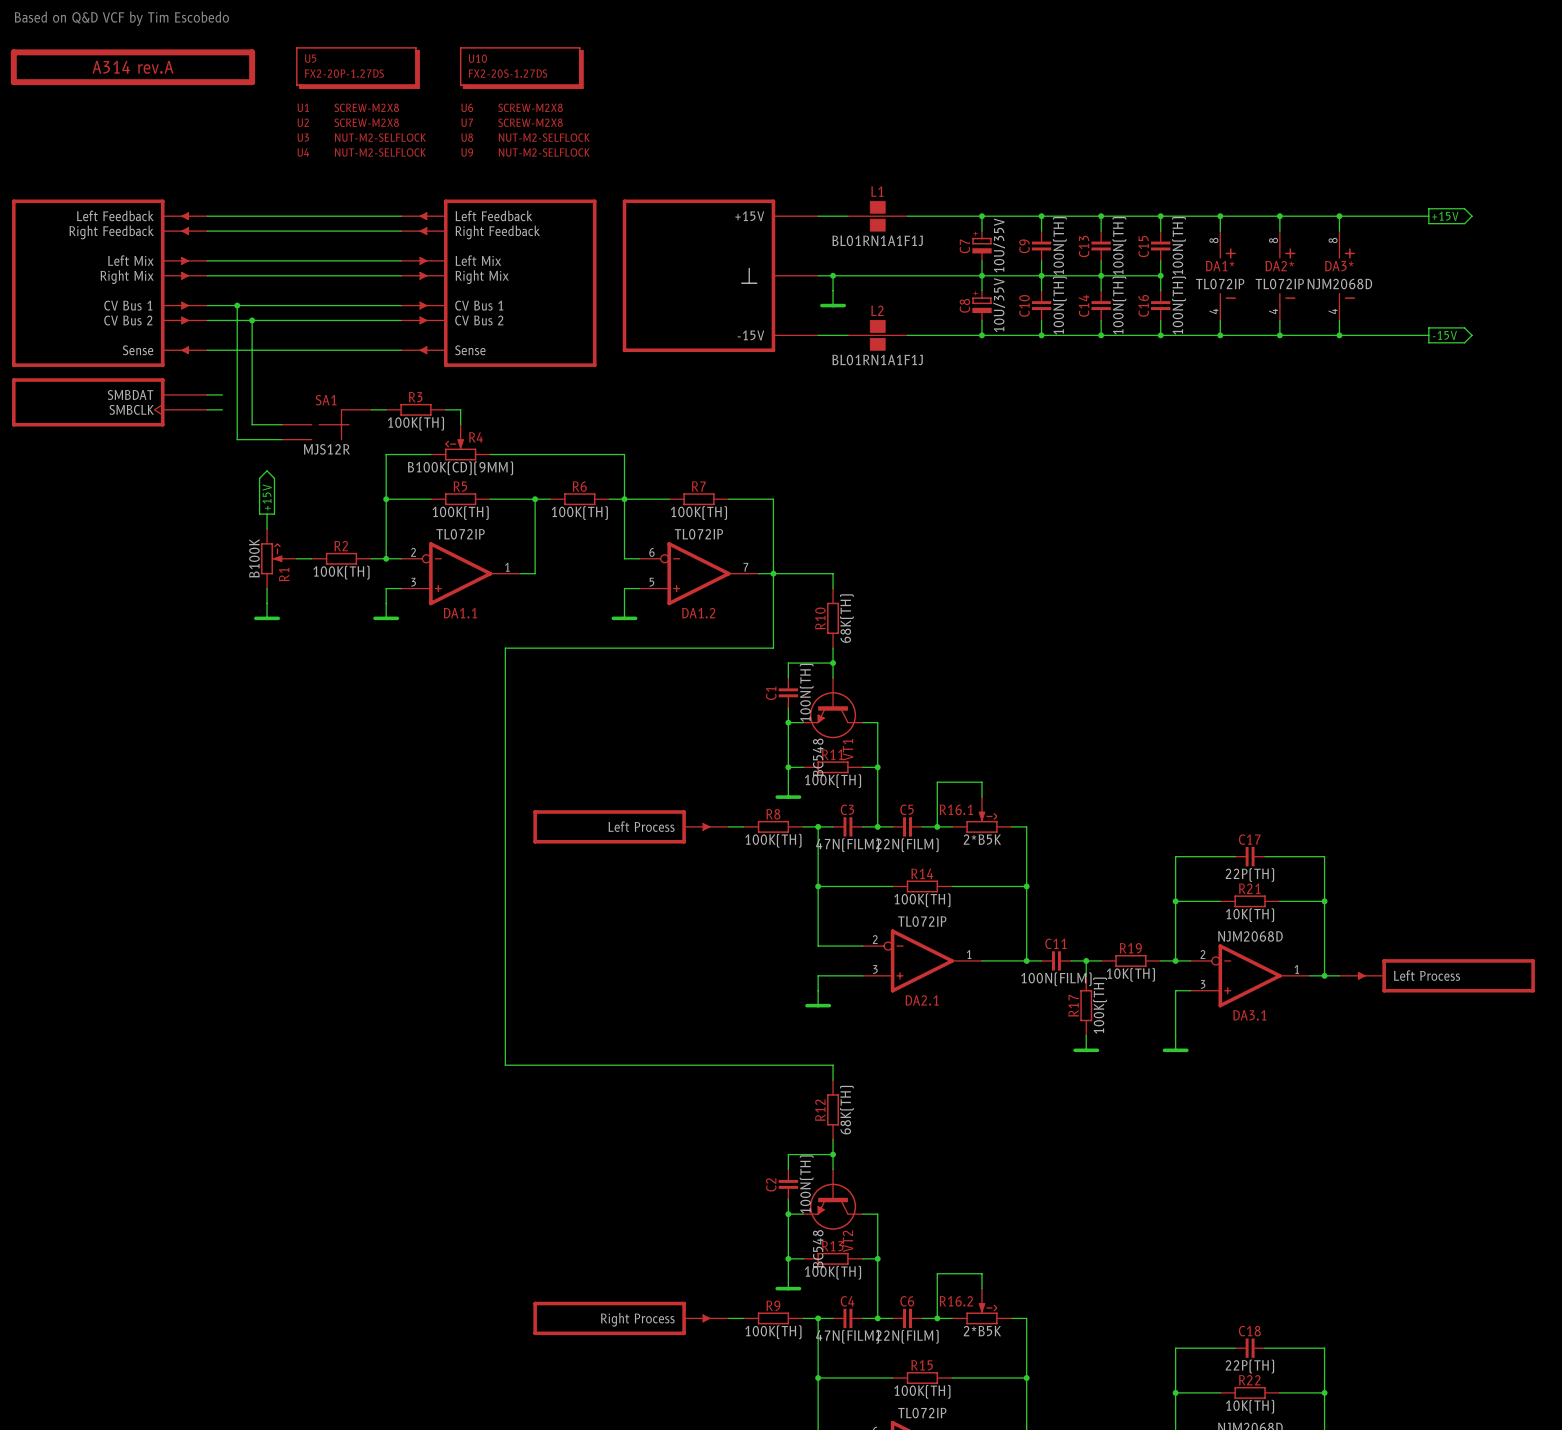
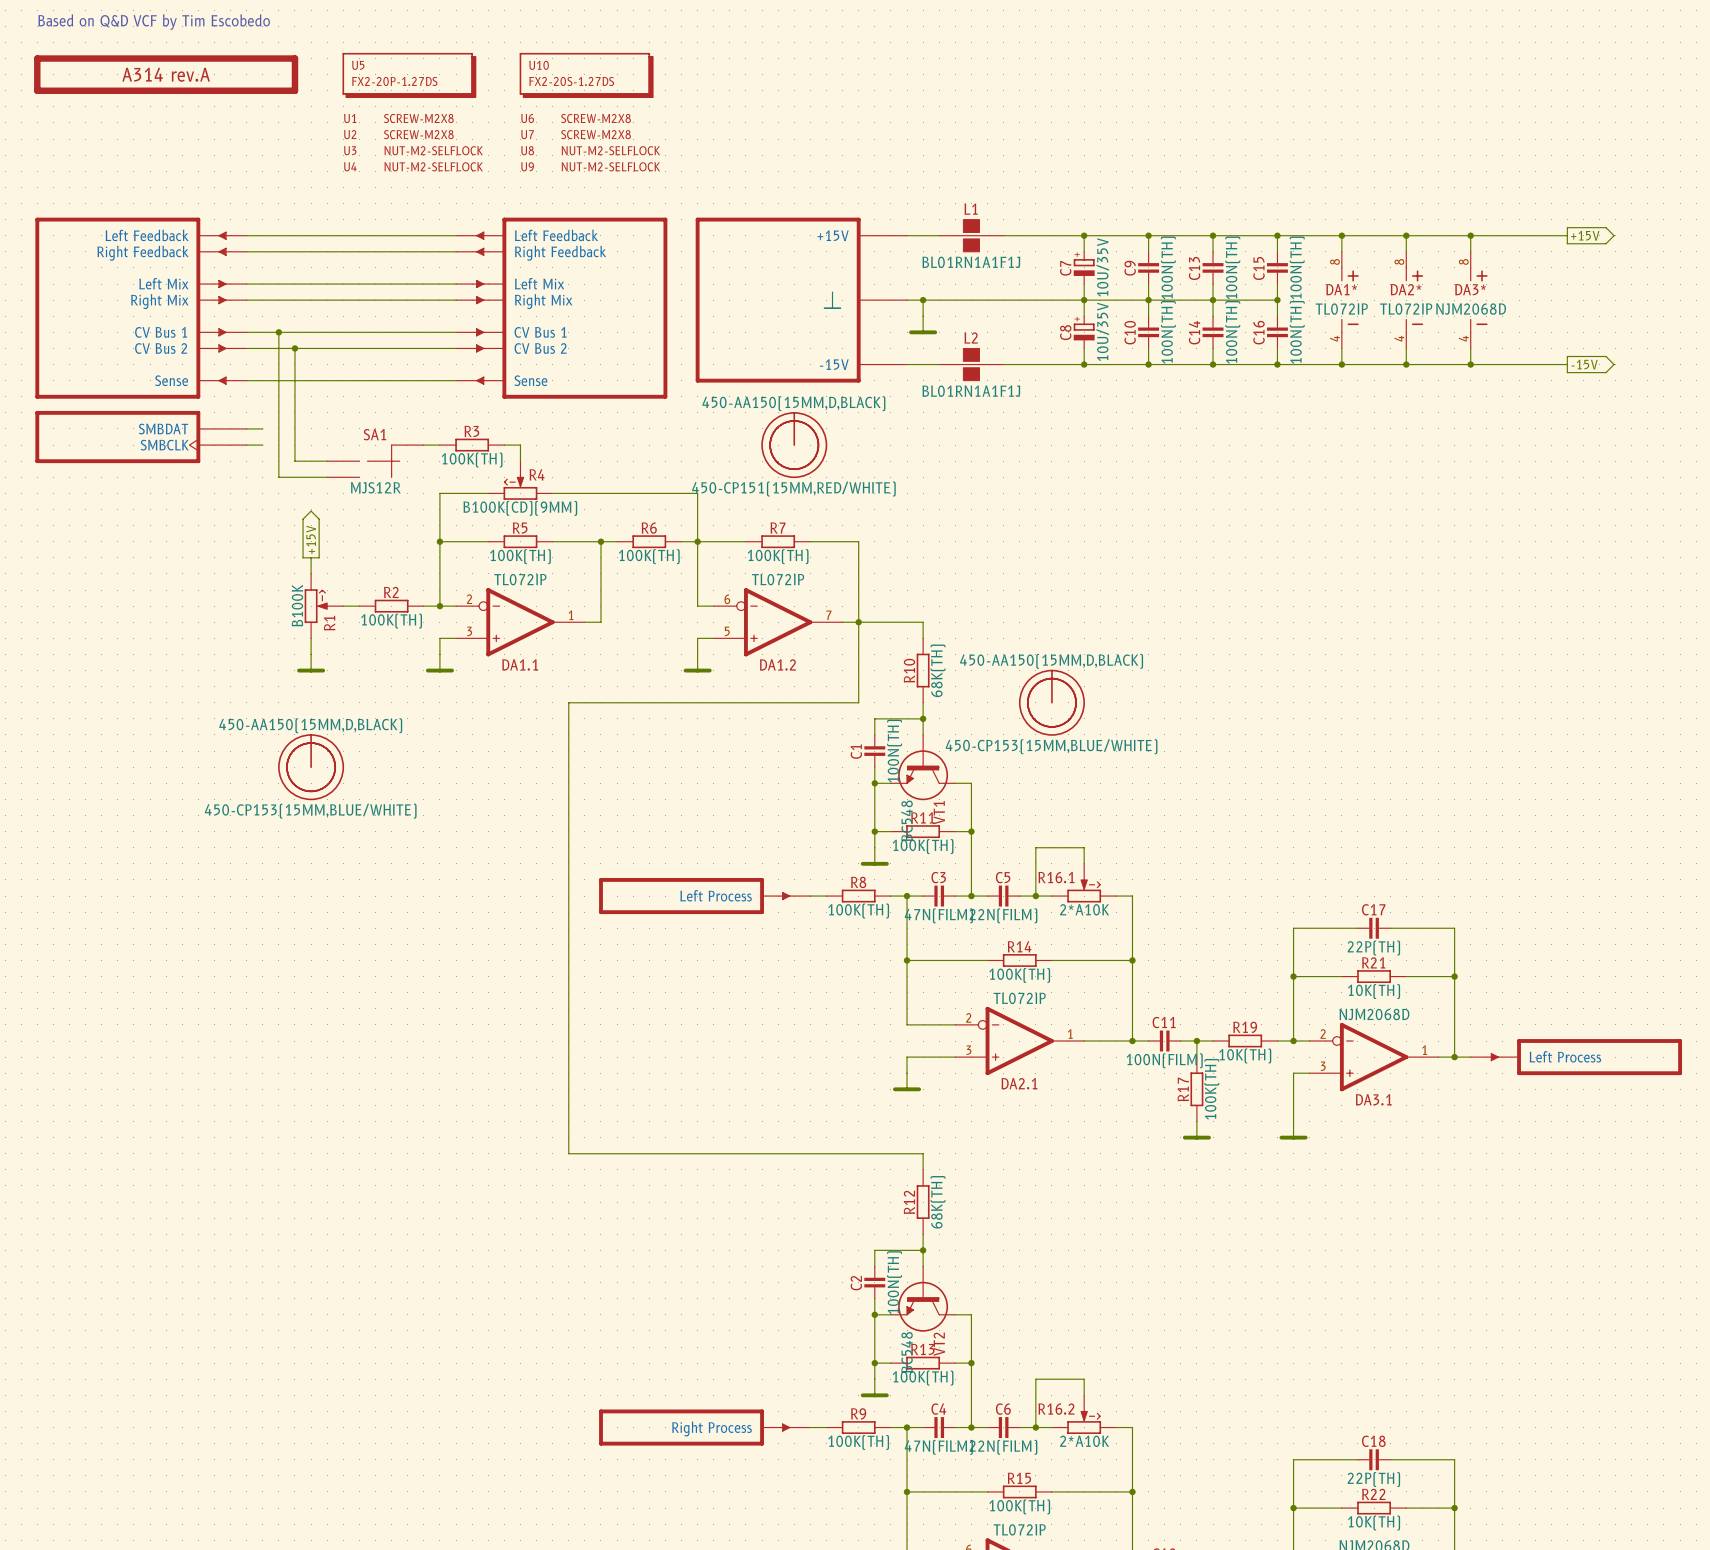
part: none -> 450-AA150(15MM,D,BLACK) (794, 445)
part: none -> 450-CP151(15MM,RED/WHITE) (794, 445)
part: none -> 450-AA150(15MM,D,BLACK) (1051, 702)
part: none -> 450-CP153(15MM,BLUE/WHITE) (1051, 702)
part: none -> 450-AA150(15MM,D,BLACK) (311, 767)
part: none -> 450-CP153(15MM,BLUE/WHITE) (311, 767)
R16.1 value: 2*B5K (982, 839) -> 2*A10K (1084, 909)
R16.2 value: 2*B5K (982, 1331) -> 2*A10K (1084, 1441)

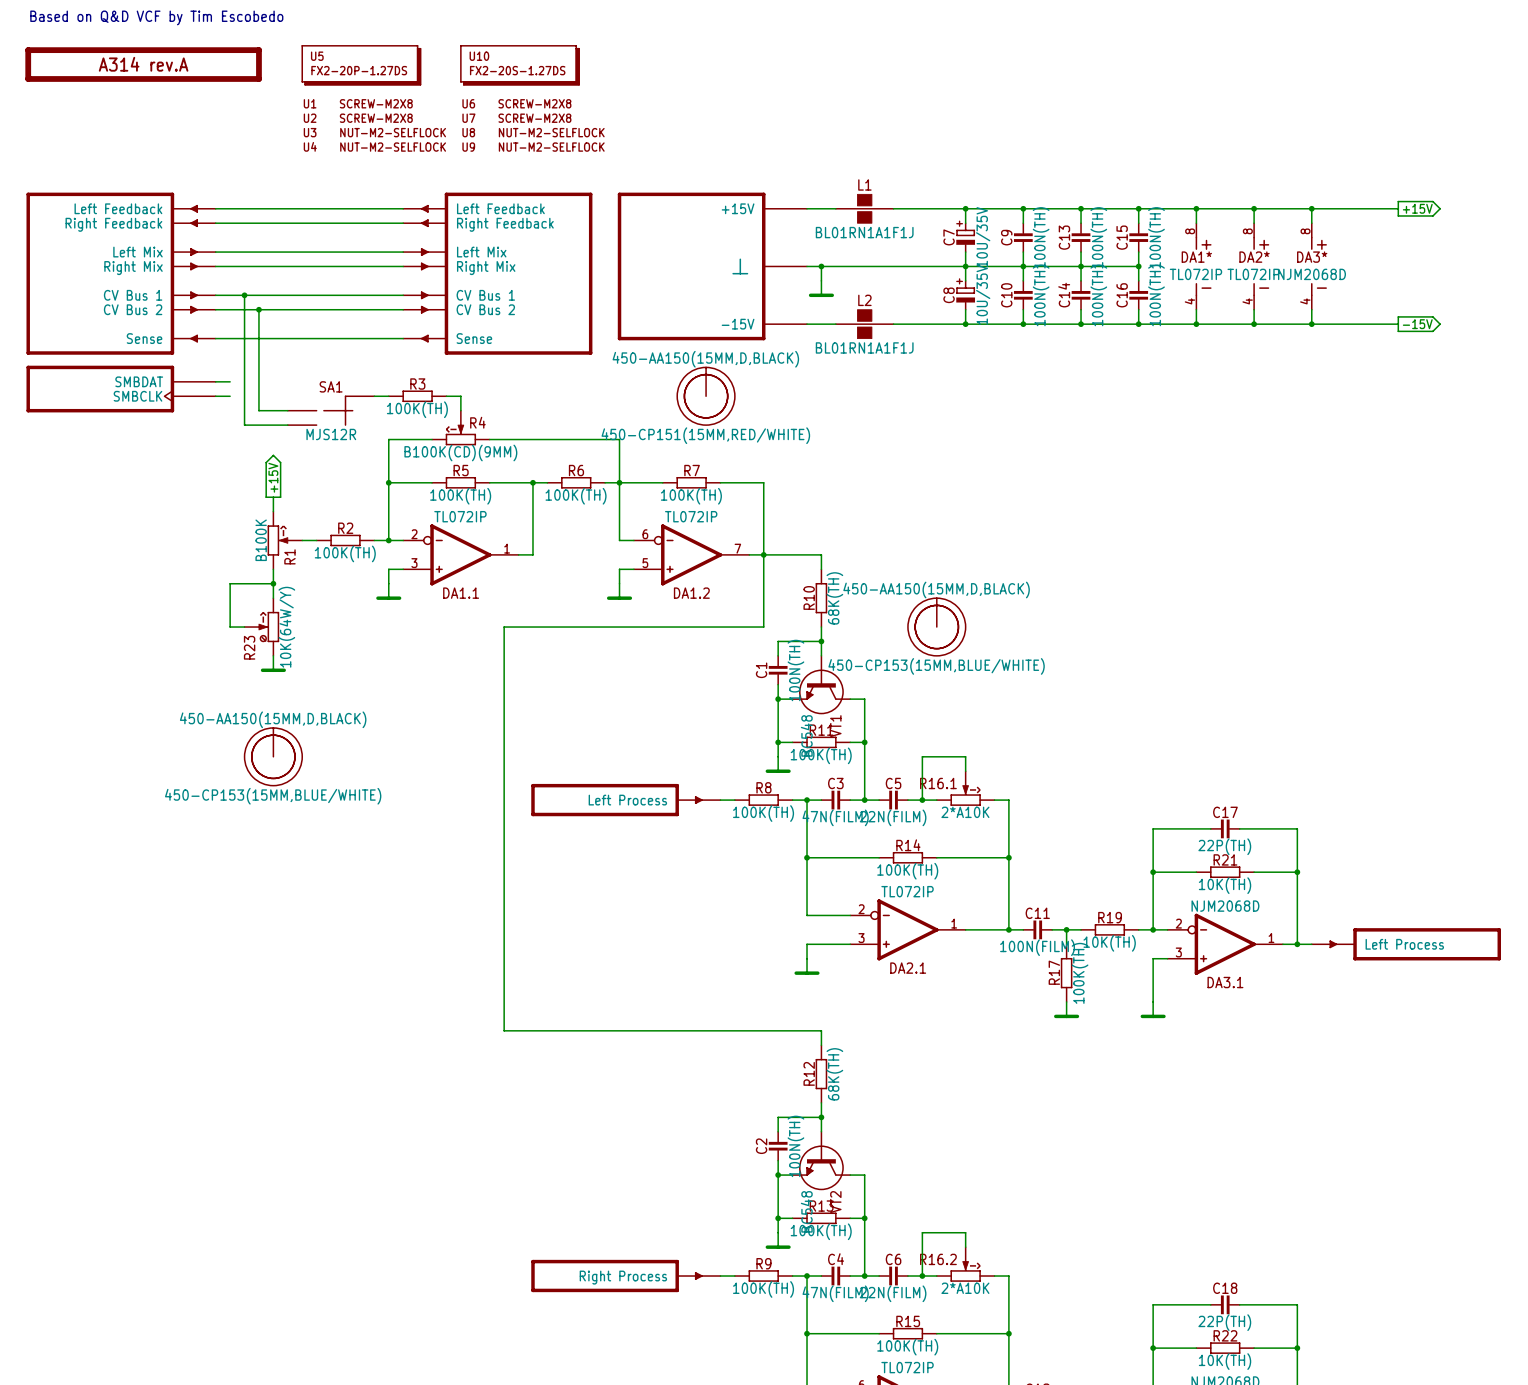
junction: none -> (273, 583)
power symbol position: (311, 663) -> (273, 663)
wire: none -> (273, 598) (273, 583) (230, 583) (230, 627) (244, 627)
R23: none -> 10K(64W/Y) (261, 627)
part position: (311, 767) -> (273, 756)
part position: (311, 767) -> (273, 756)

